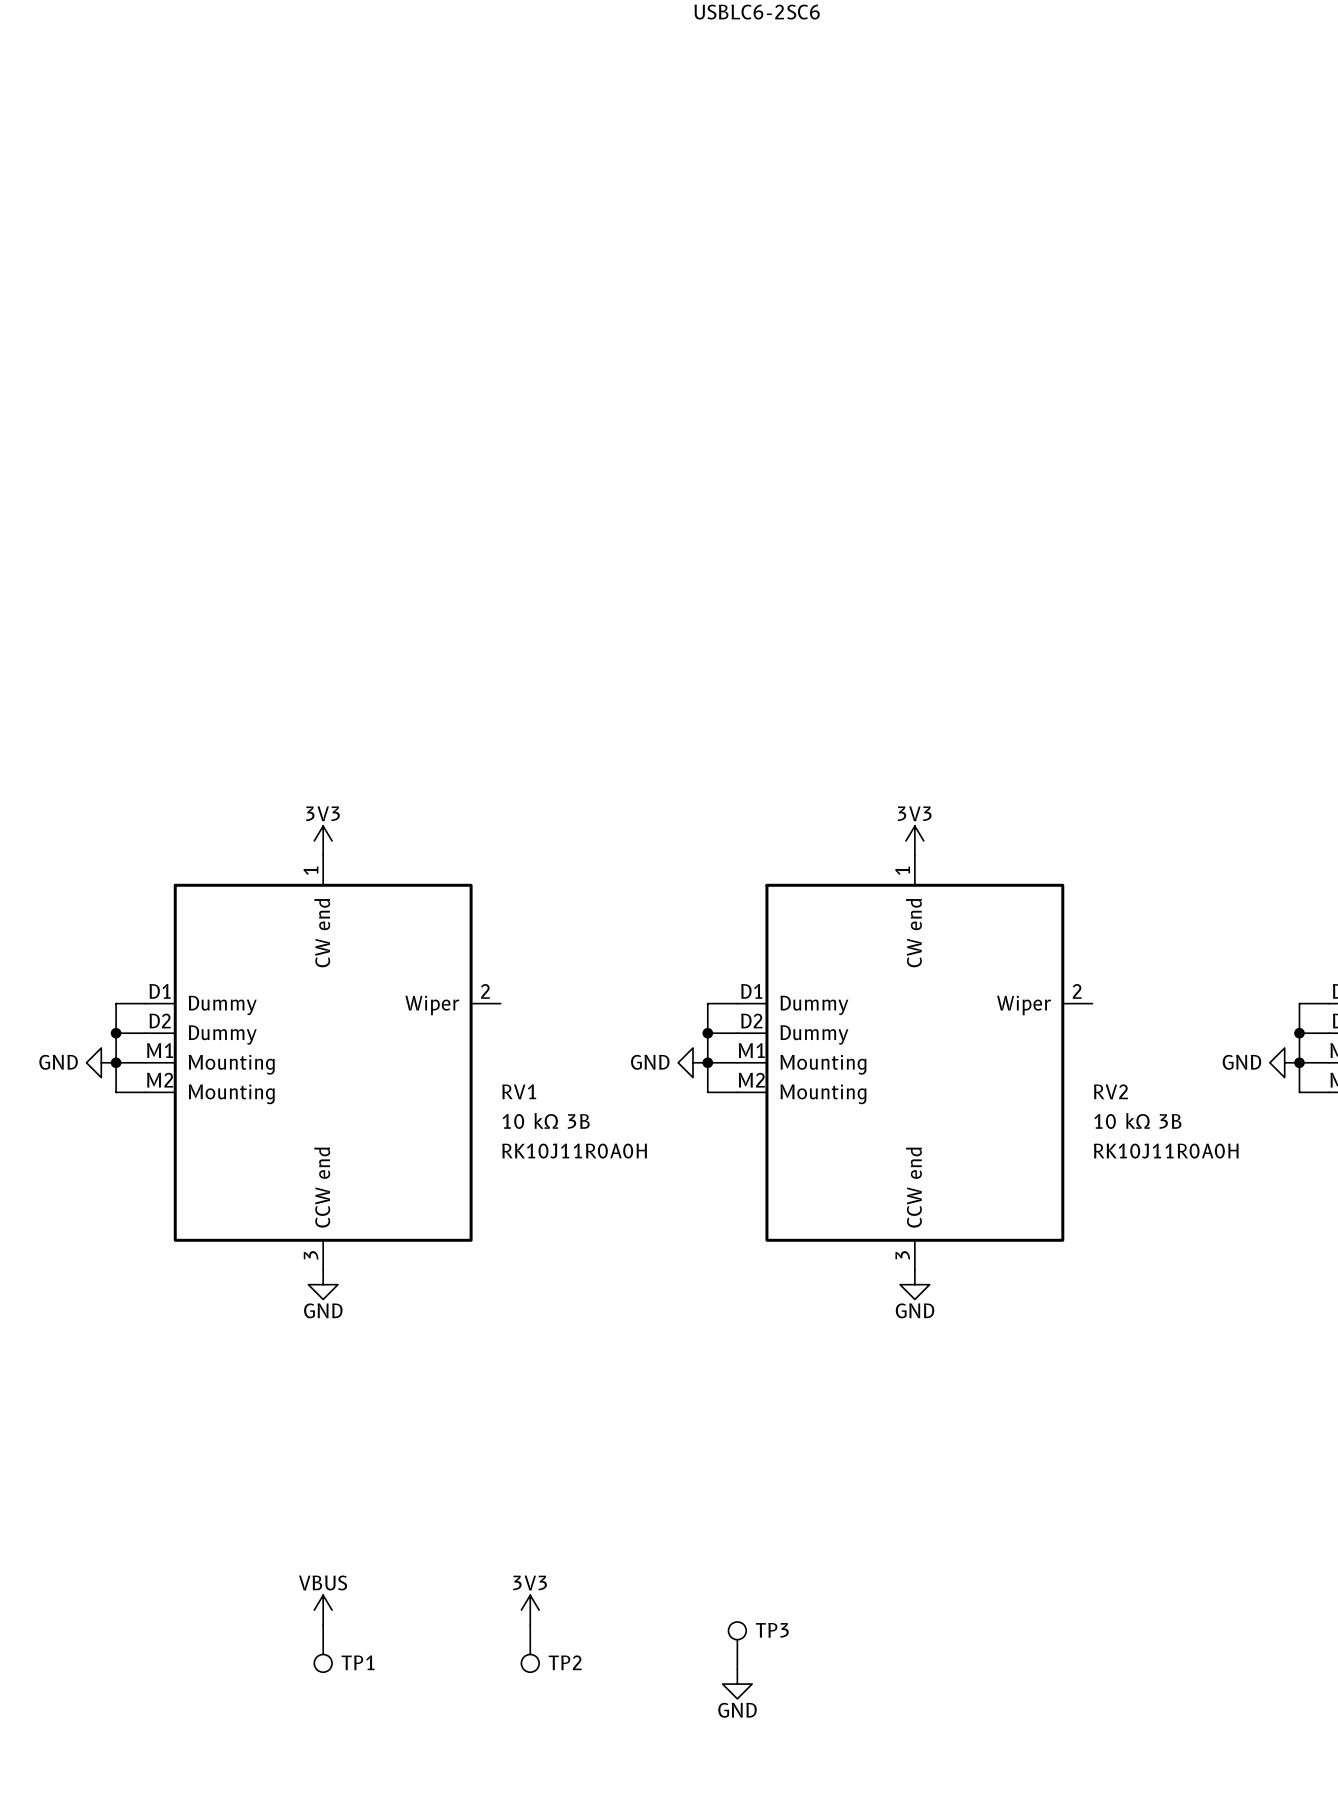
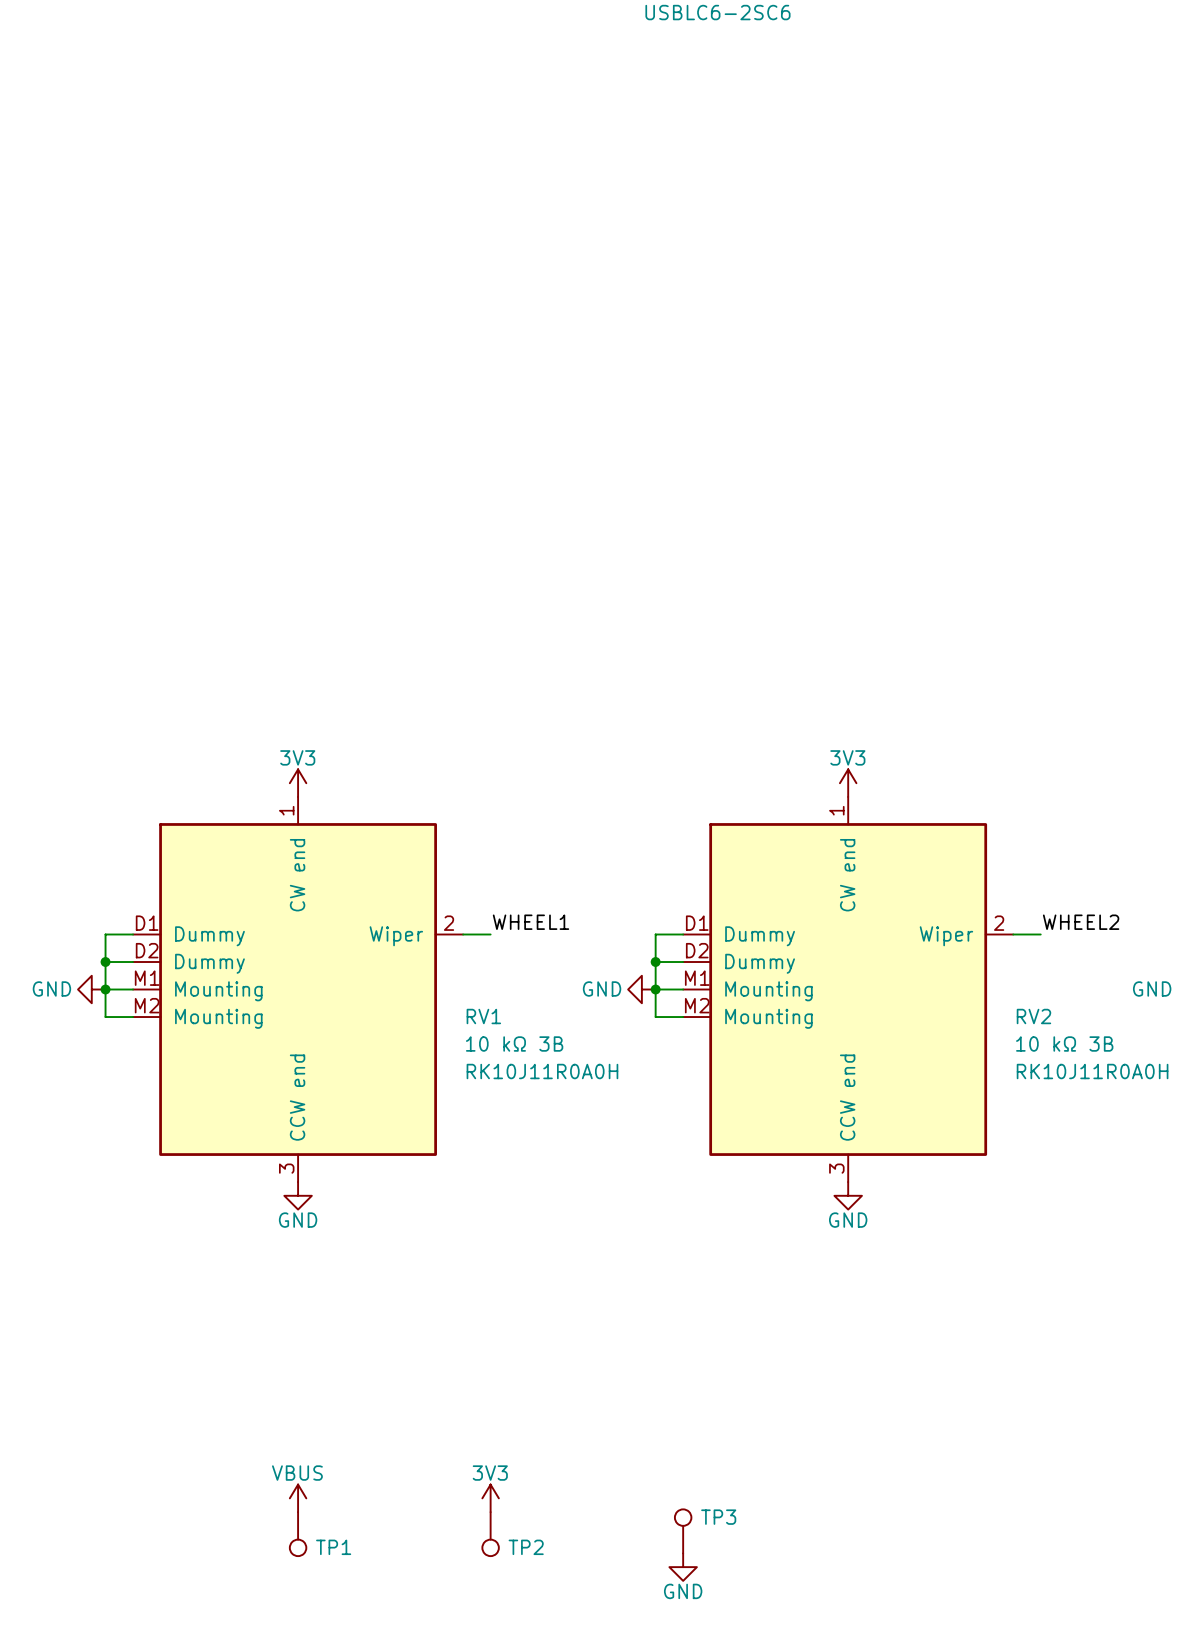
label: none -> WHEEL1 (530, 922)
label: none -> WHEEL2 (1081, 922)
wire: none -> (463, 934) (490, 934)
wire: none -> (1013, 934) (1040, 934)

